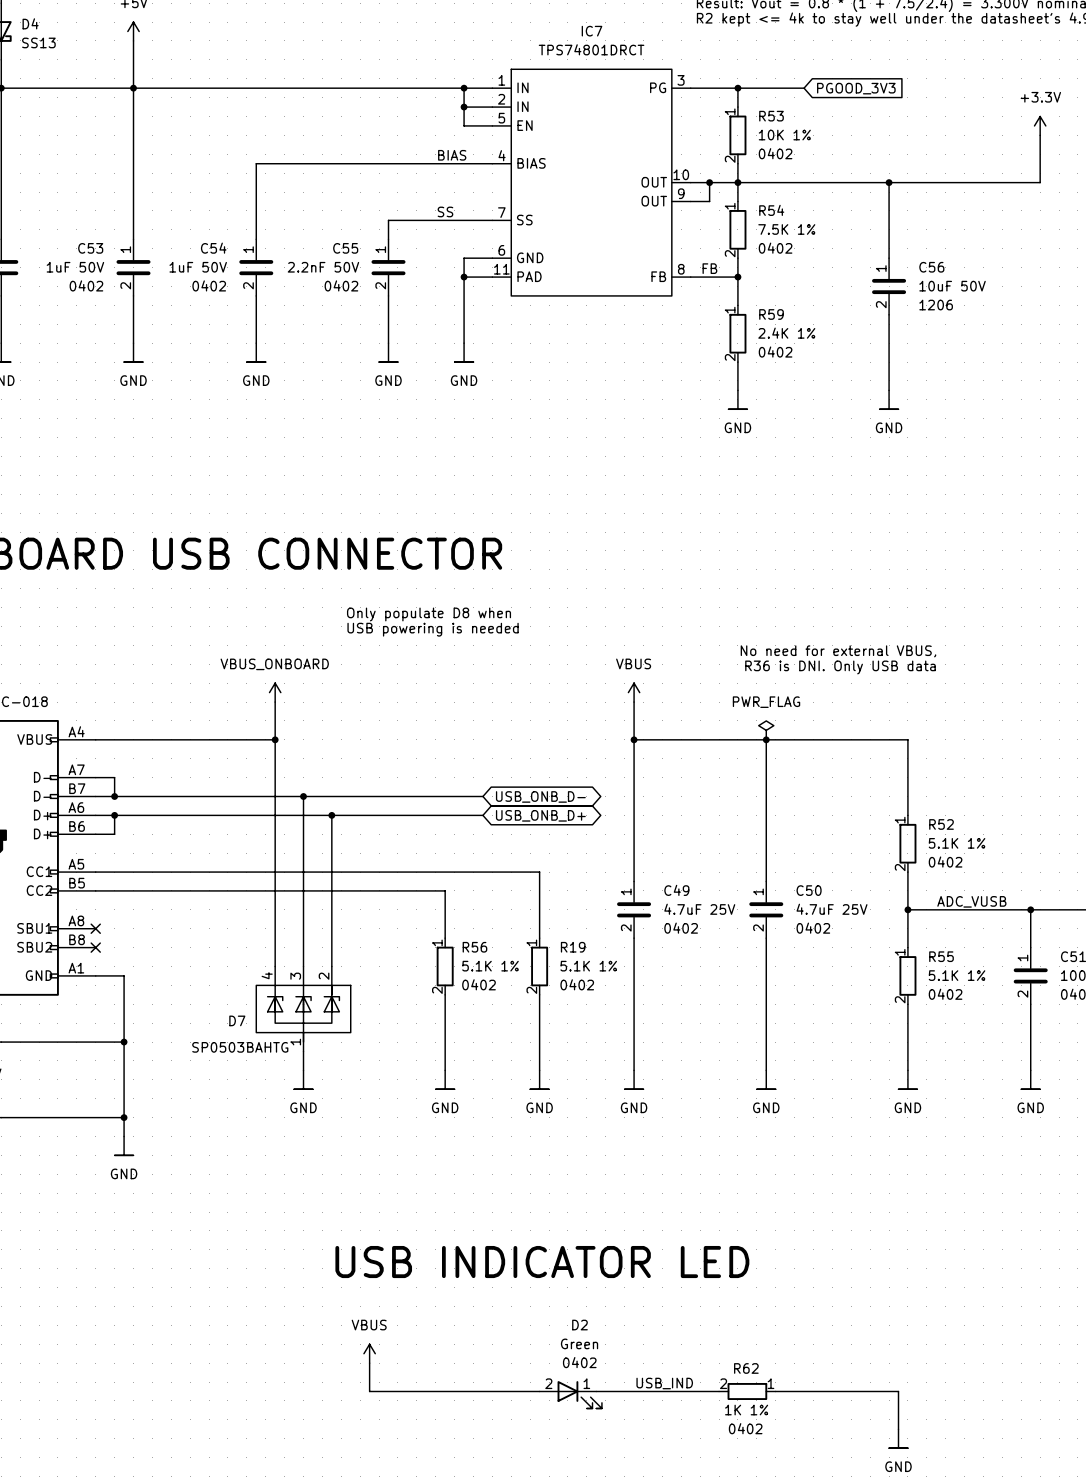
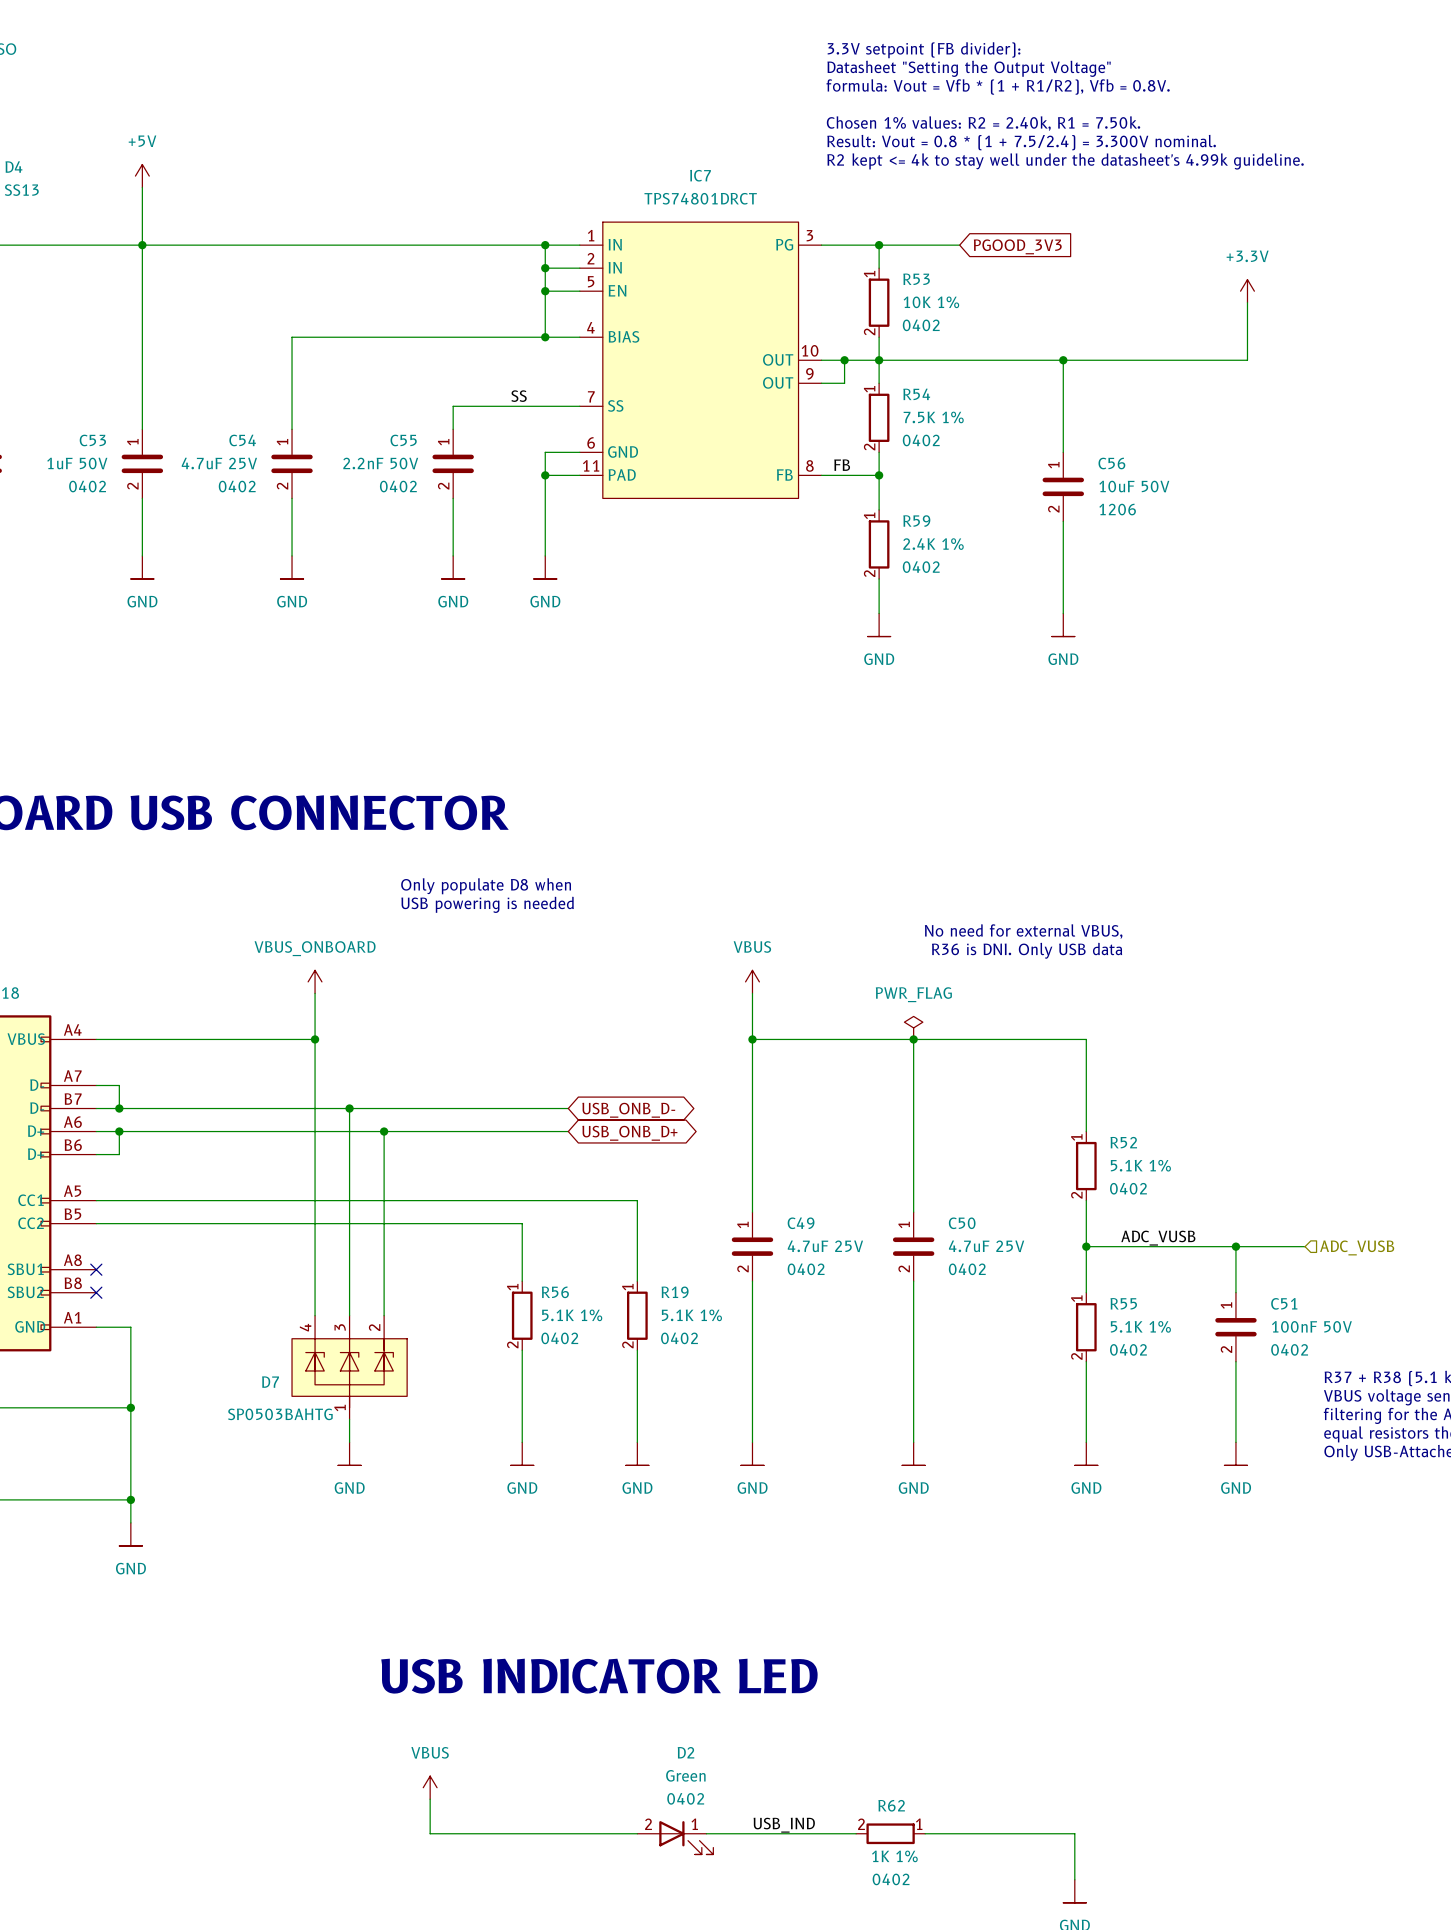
wire: none -> (545, 291) (545, 337)
junction: none -> (545, 291)
label: BIAS (452, 155) -> none
junction: none -> (545, 337)
C54 value: 1uF 50V (198, 267) -> 4.7uF 25V (219, 463)

